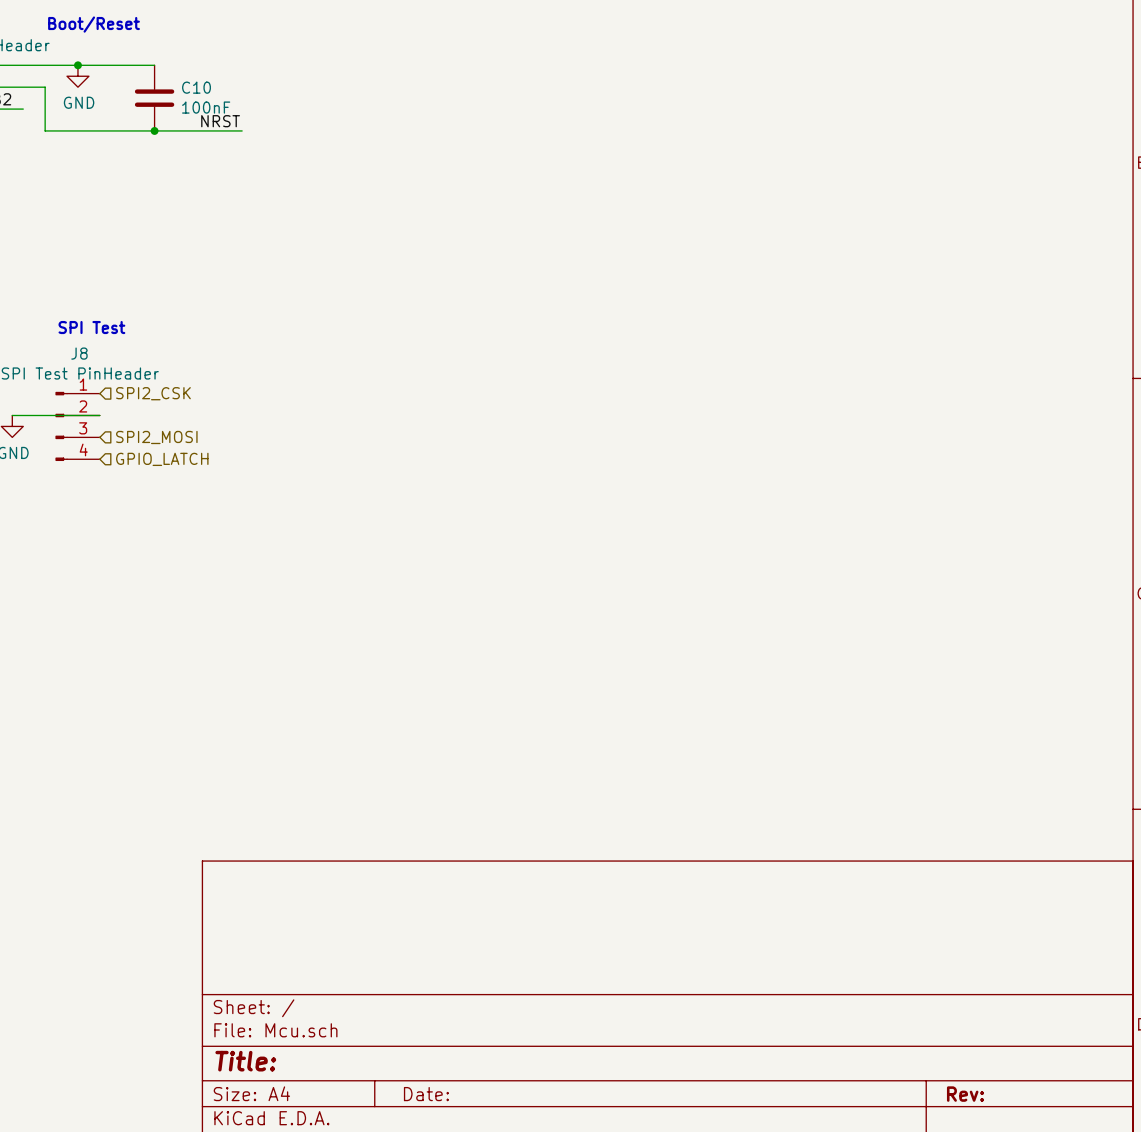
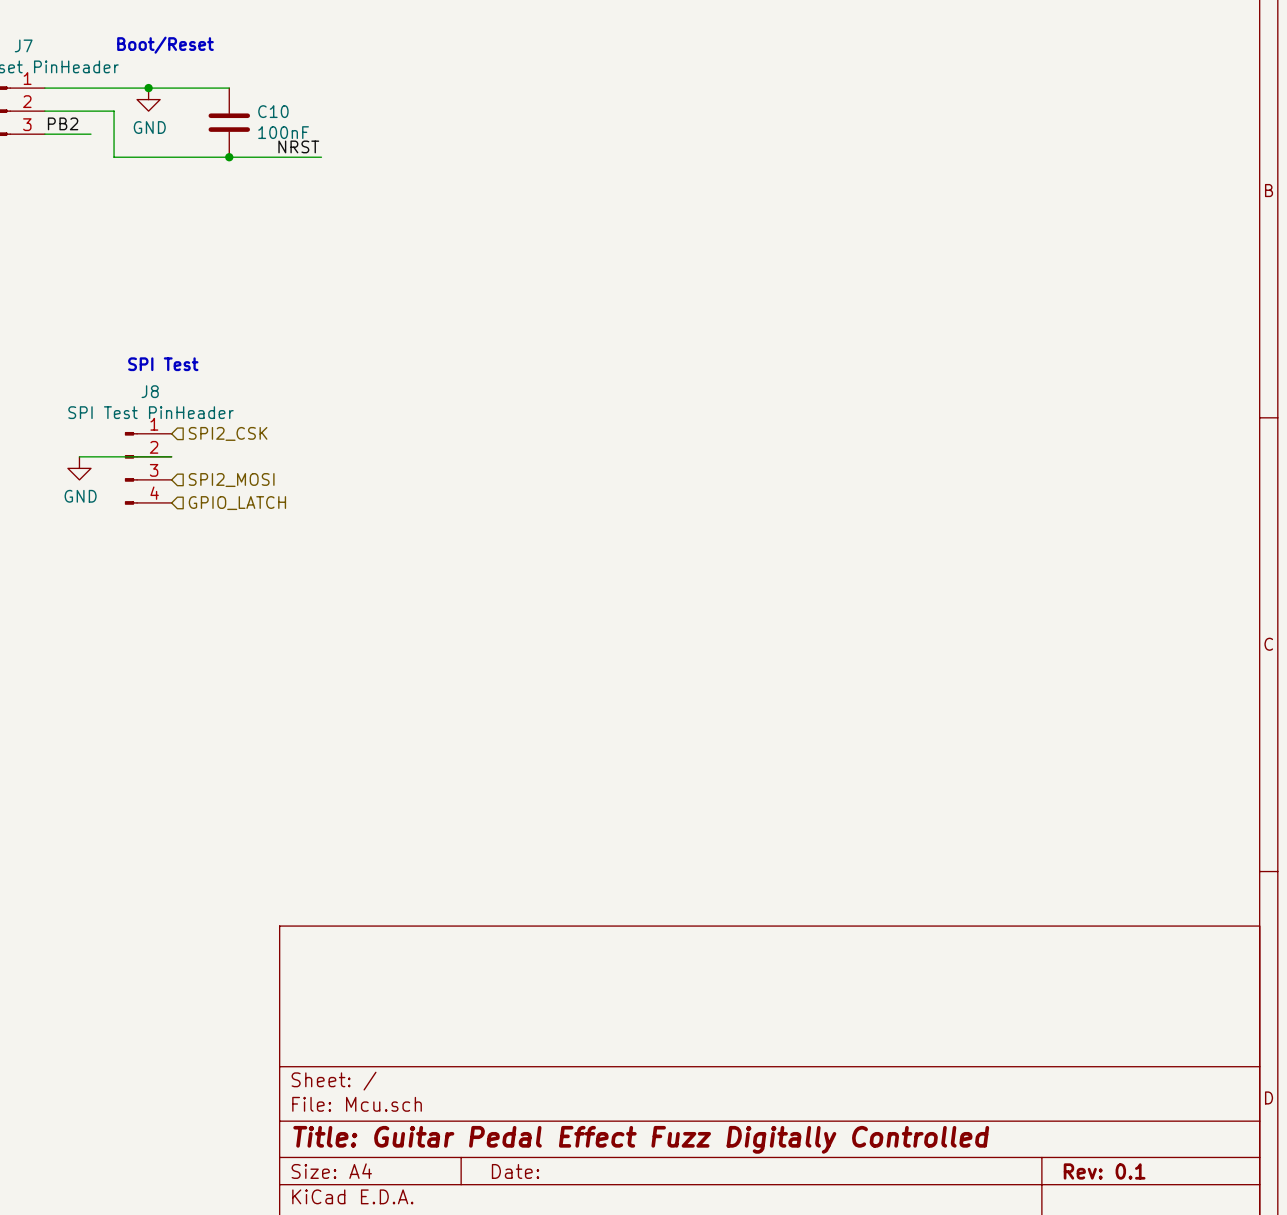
title block: Title: (245, 1061) -> Title: Guitar Pedal Effect Fuzz Digitally Controlled (641, 1139)
title block: Rev: (965, 1094) -> Rev: 0.1 (1104, 1171)

